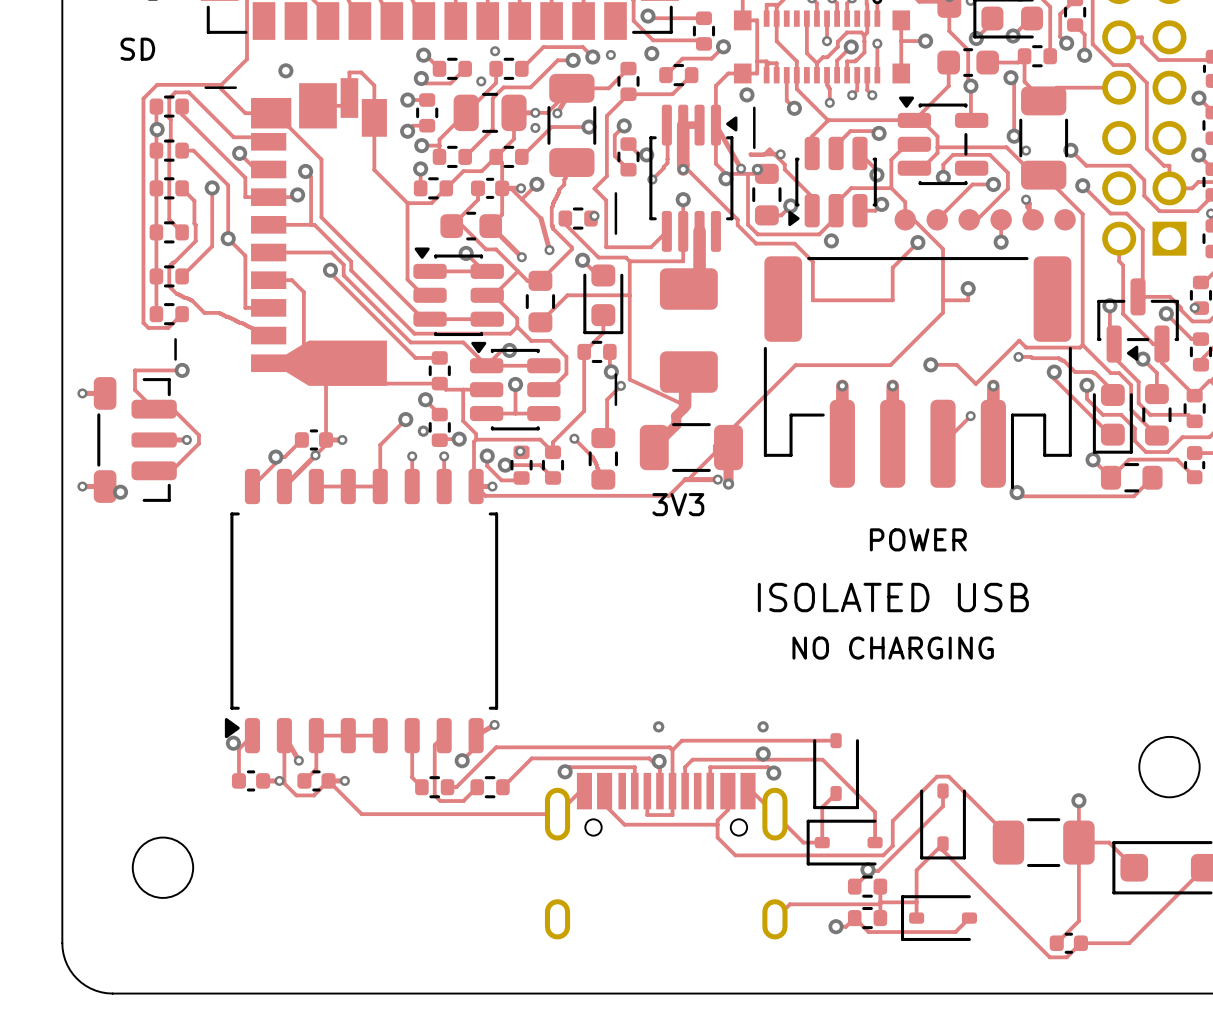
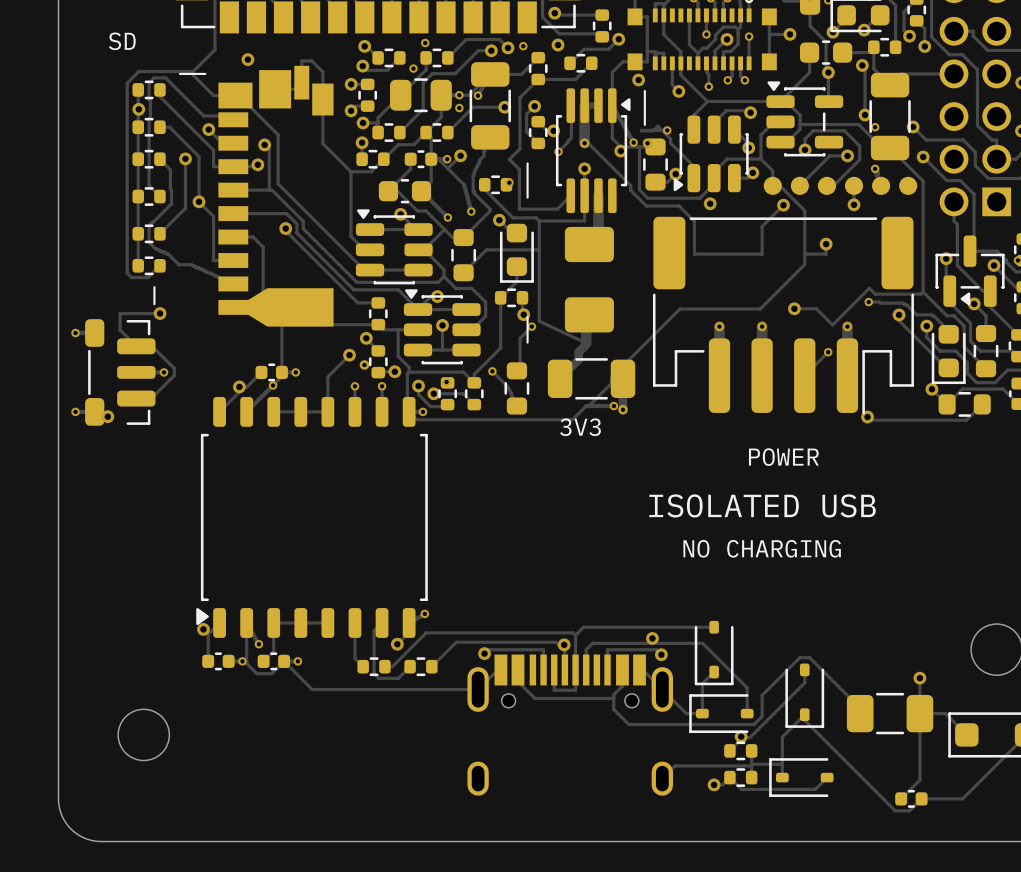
via: (658, 726) -> none
via: (763, 726) -> none

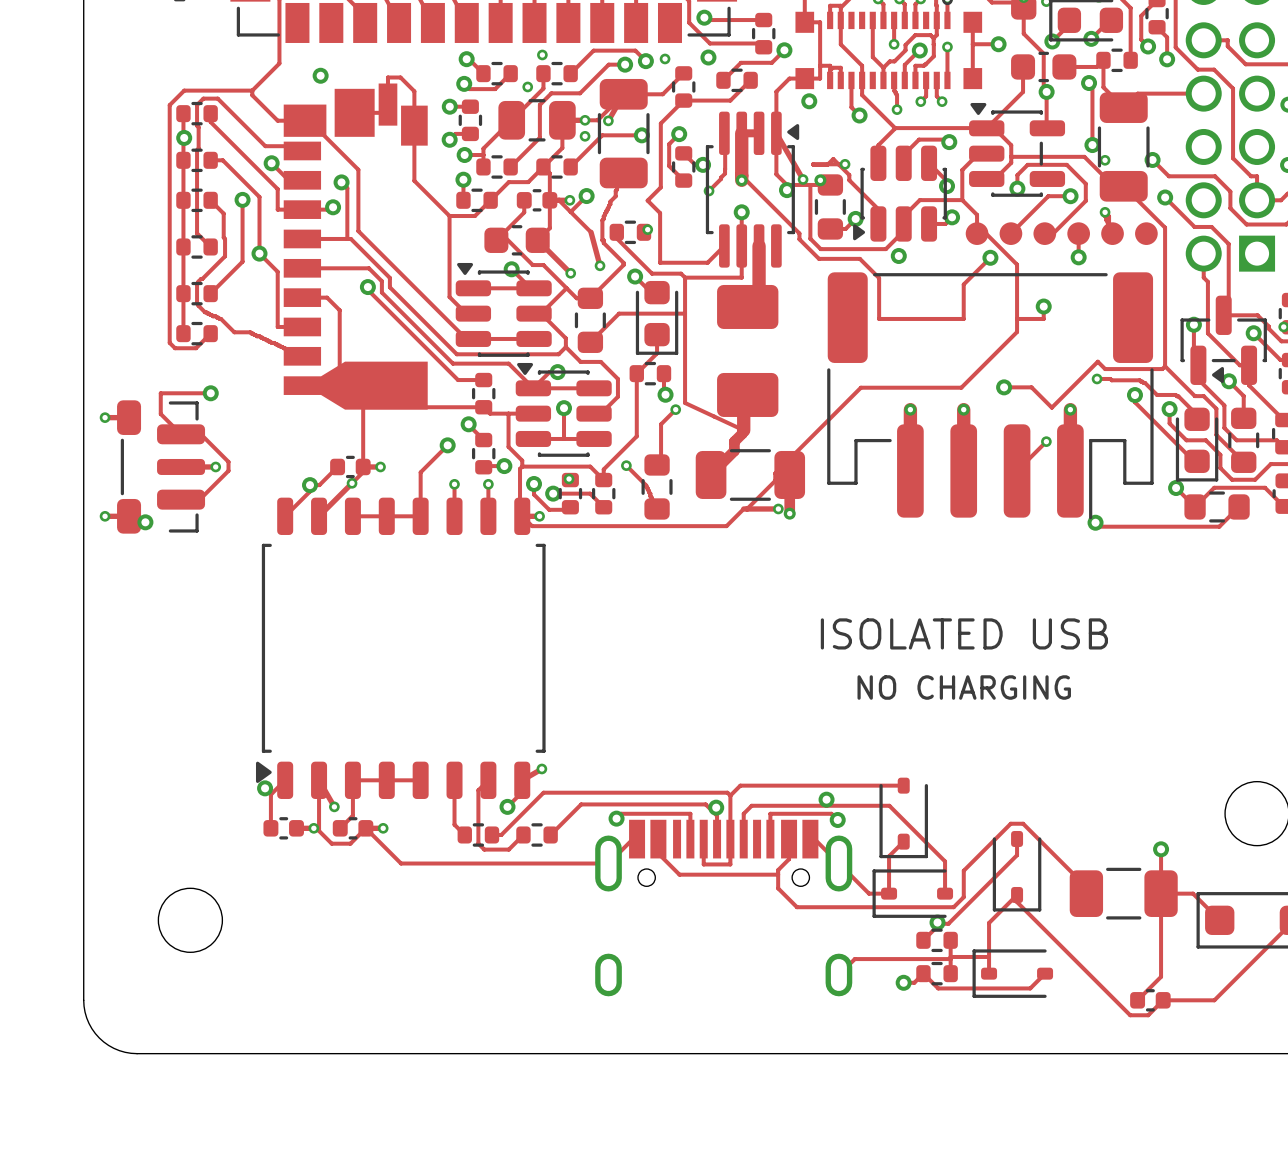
text: SD (122, 41) -> none
line: (179, 73) (205, 73) -> none
line: (644, 90) (644, 124) -> none
line: (527, 163) (527, 197) -> none
line: (154, 287) (154, 304) -> none
line: (527, 317) (527, 342) -> none
via: (364, 364) -> none
text: 3V3 (580, 427) -> none
text: POWER (783, 457) -> none

